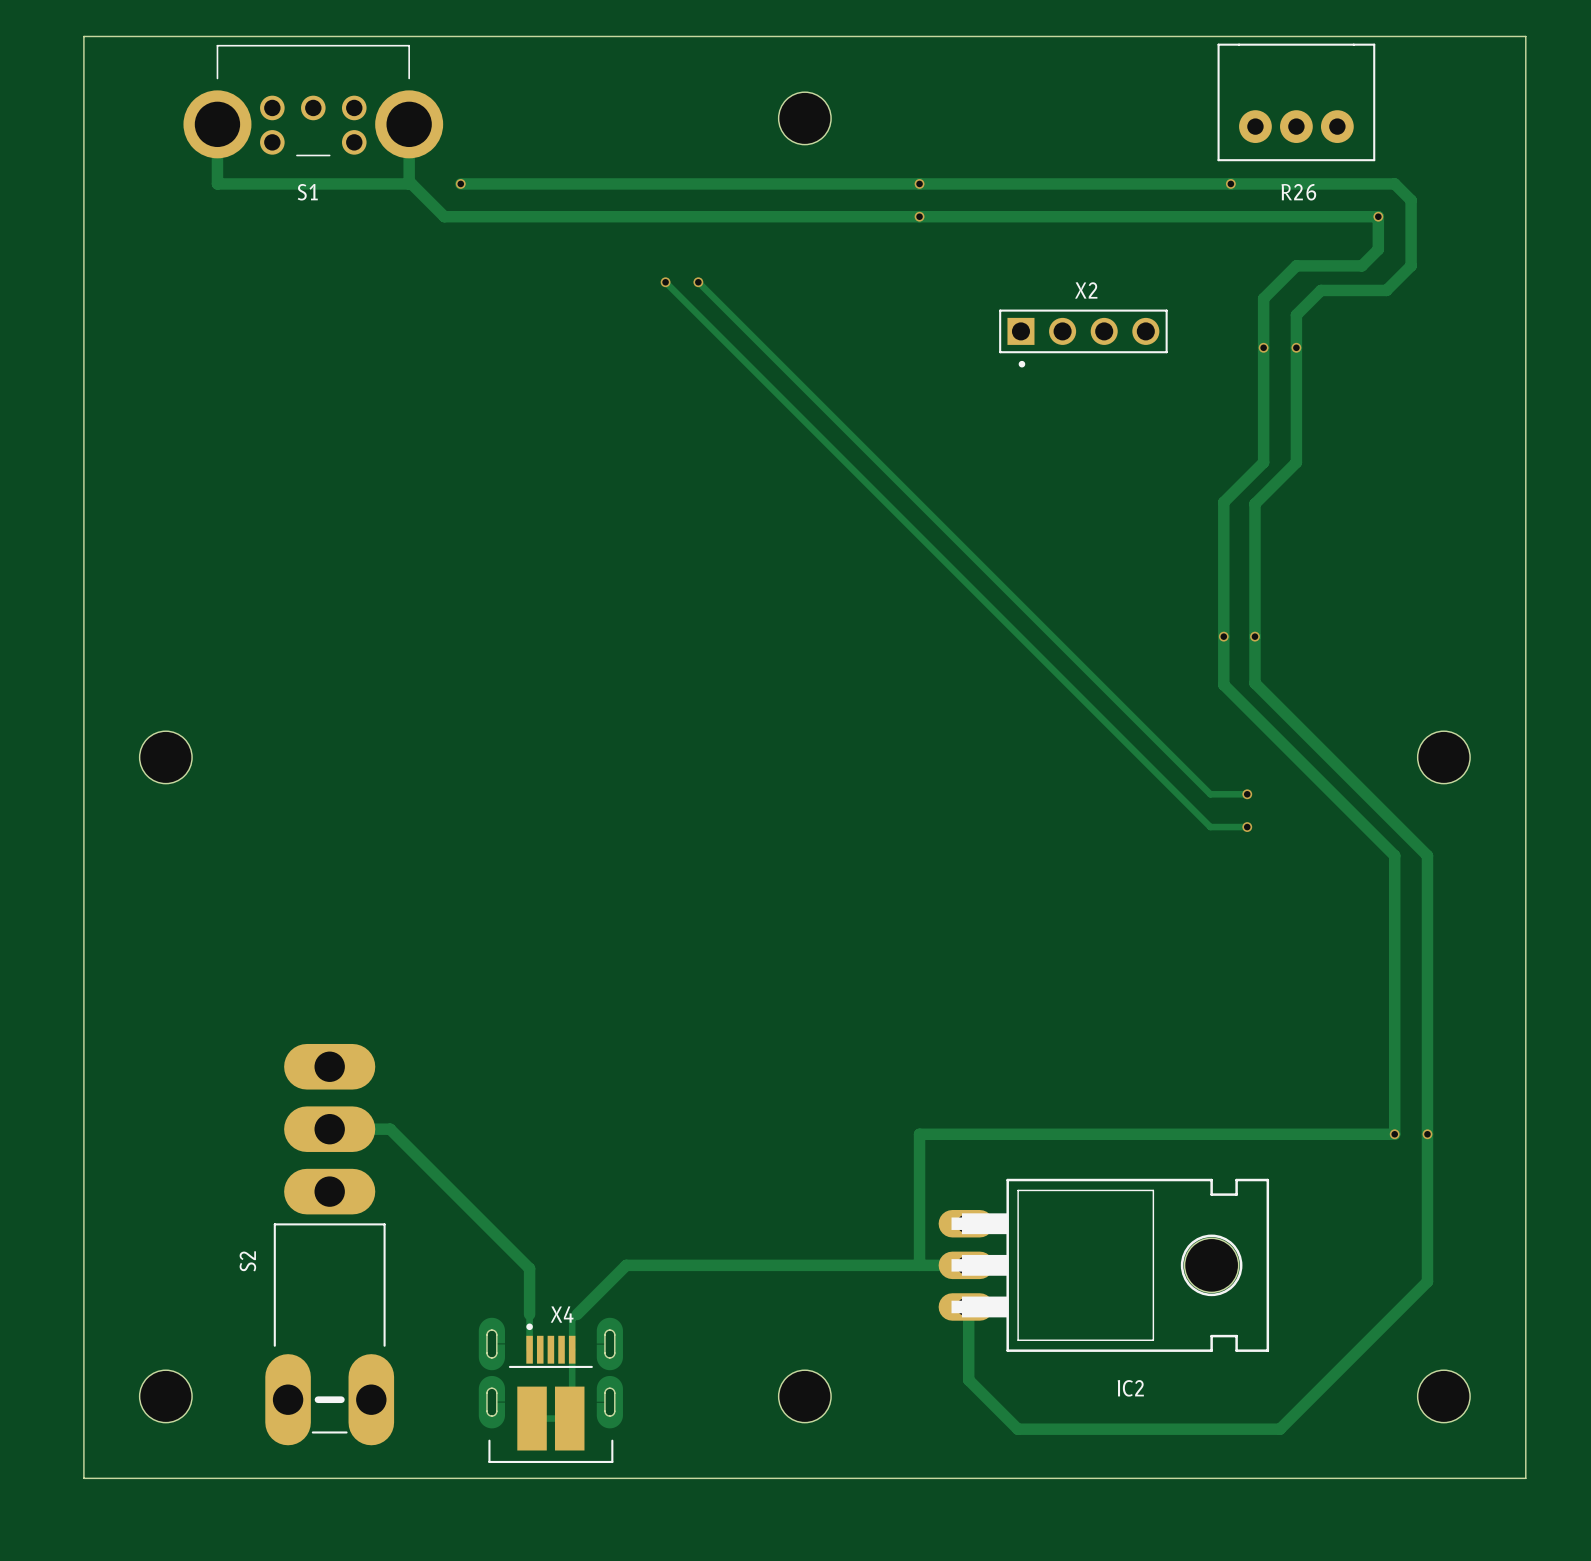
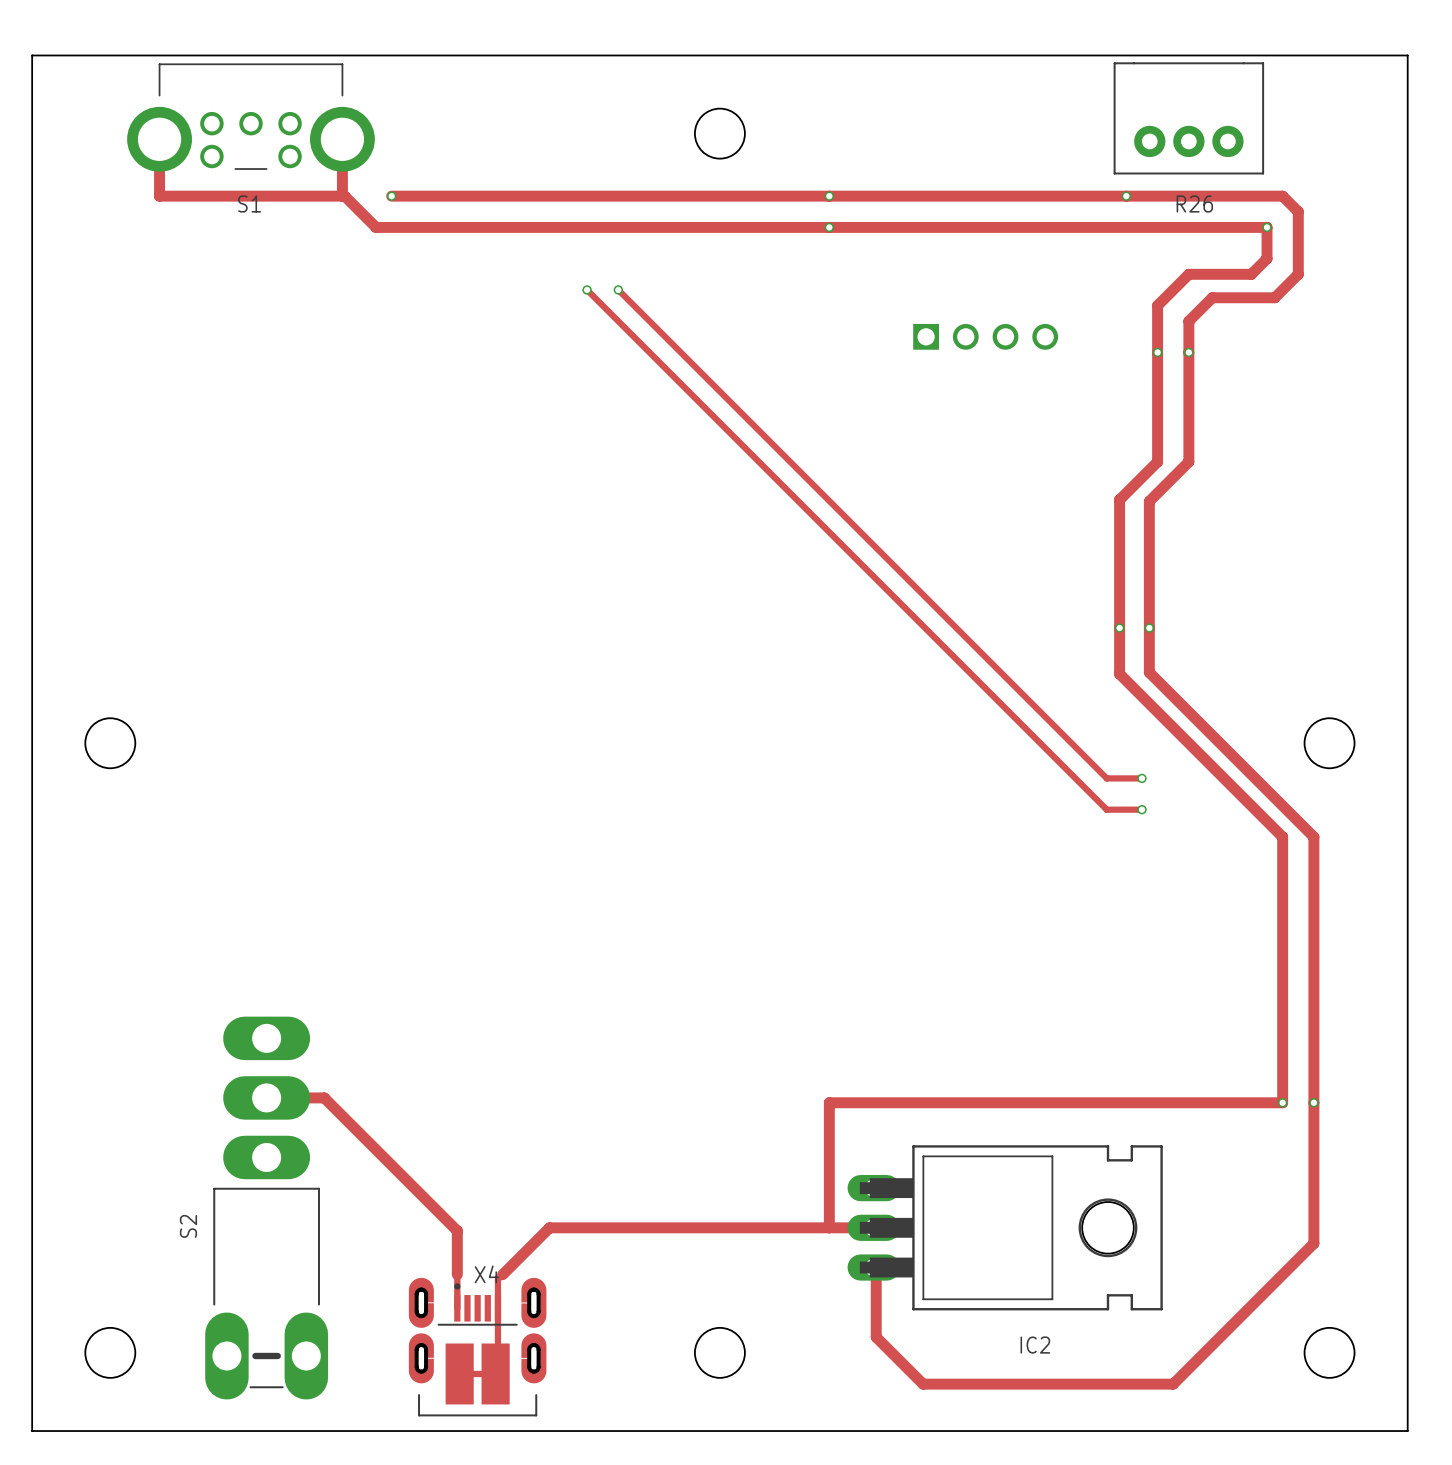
X2 side: top (1083, 338) -> bottom (985, 336)
board edge: none -> (421, 1289) (416, 1294) (416, 1312) (421, 1316) (426, 1311) (425, 1293) (421, 1289)
board edge: none -> (533, 1289) (538, 1294) (538, 1312) (533, 1316) (529, 1311) (529, 1293) (533, 1289)
board edge: none -> (421, 1345) (426, 1349) (425, 1368) (421, 1371) (416, 1366) (416, 1348) (421, 1345)
board edge: none -> (533, 1345) (538, 1349) (538, 1368) (533, 1371) (529, 1366) (529, 1348) (533, 1345)

